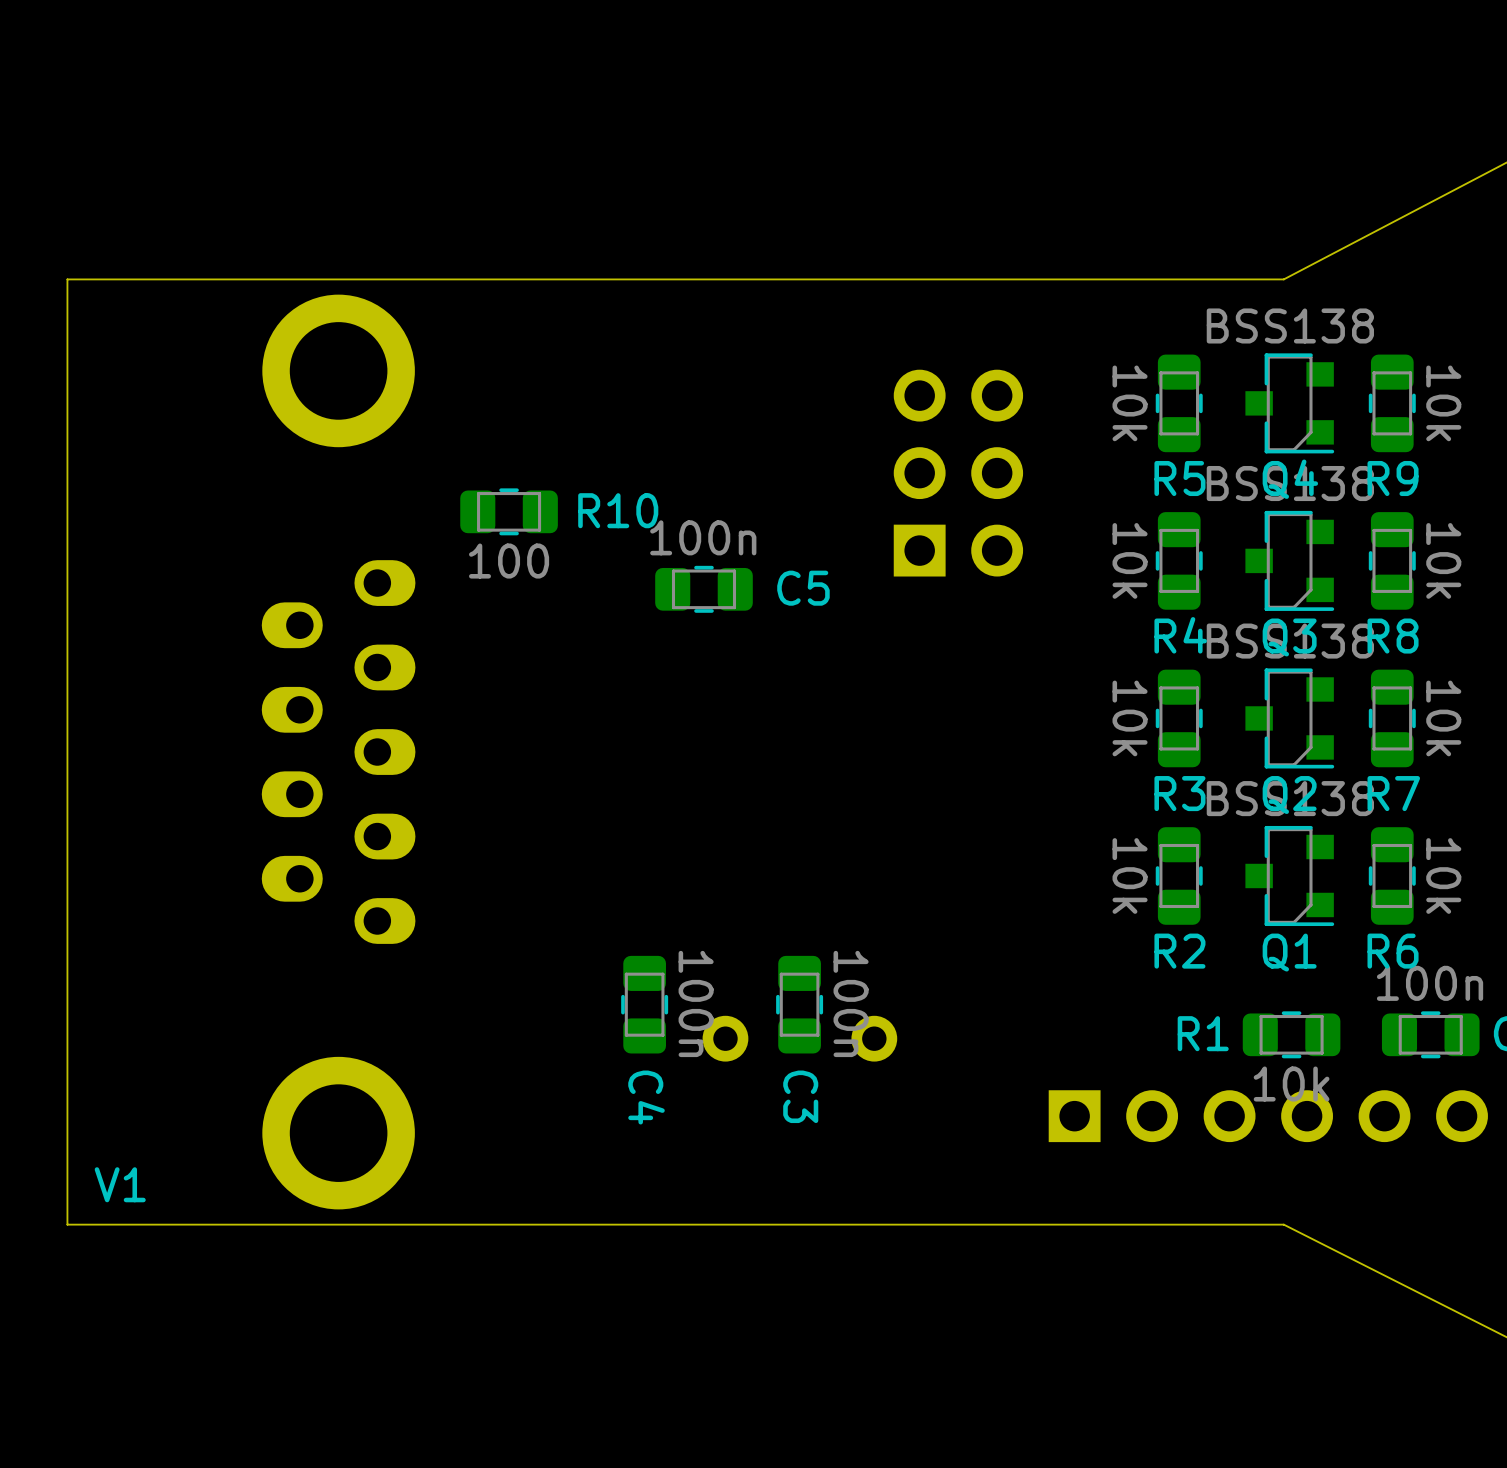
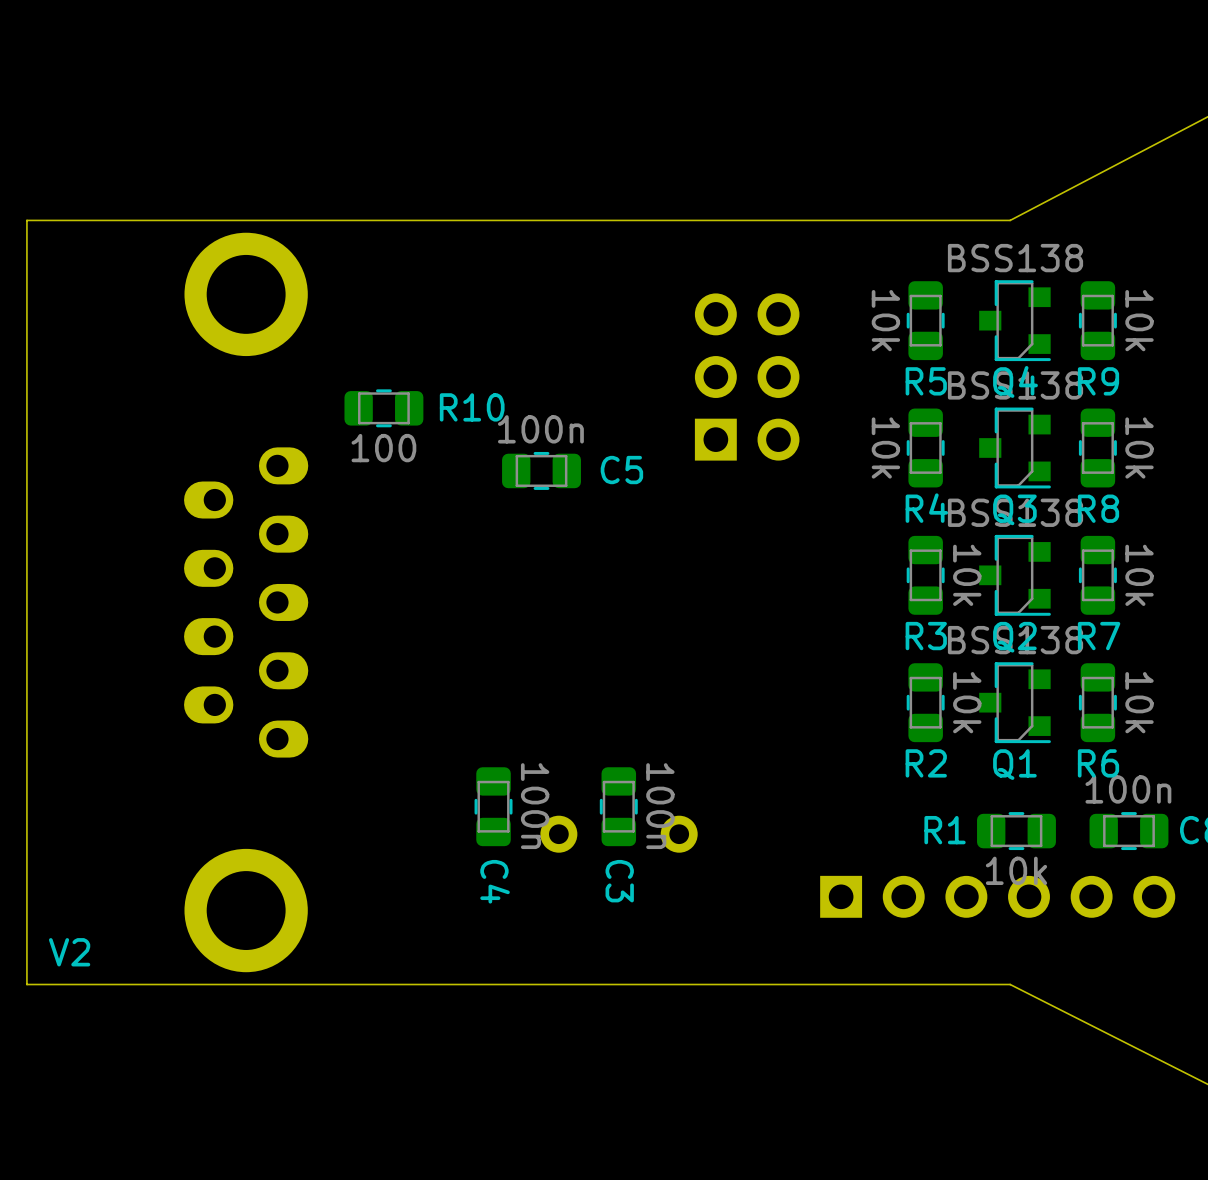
R3 value position: 10k (1130, 718) -> 10k (967, 575)
R2 value position: 10k (1130, 875) -> 10k (967, 702)
text: V1 (120, 1184) -> V2 (69, 952)

